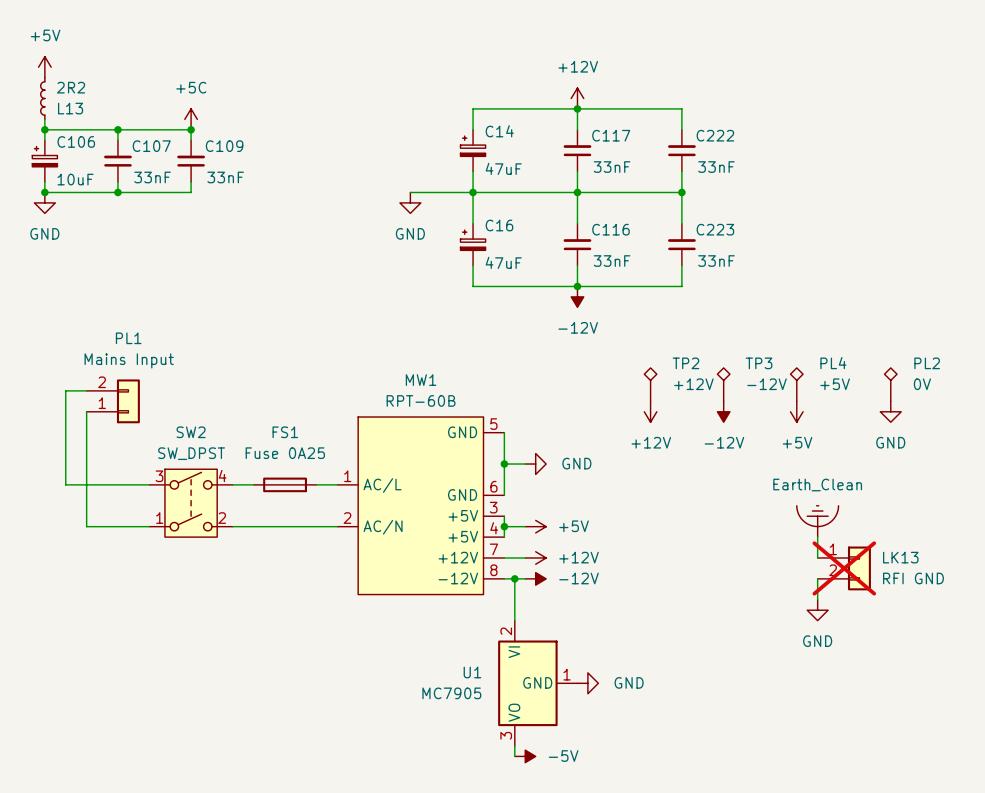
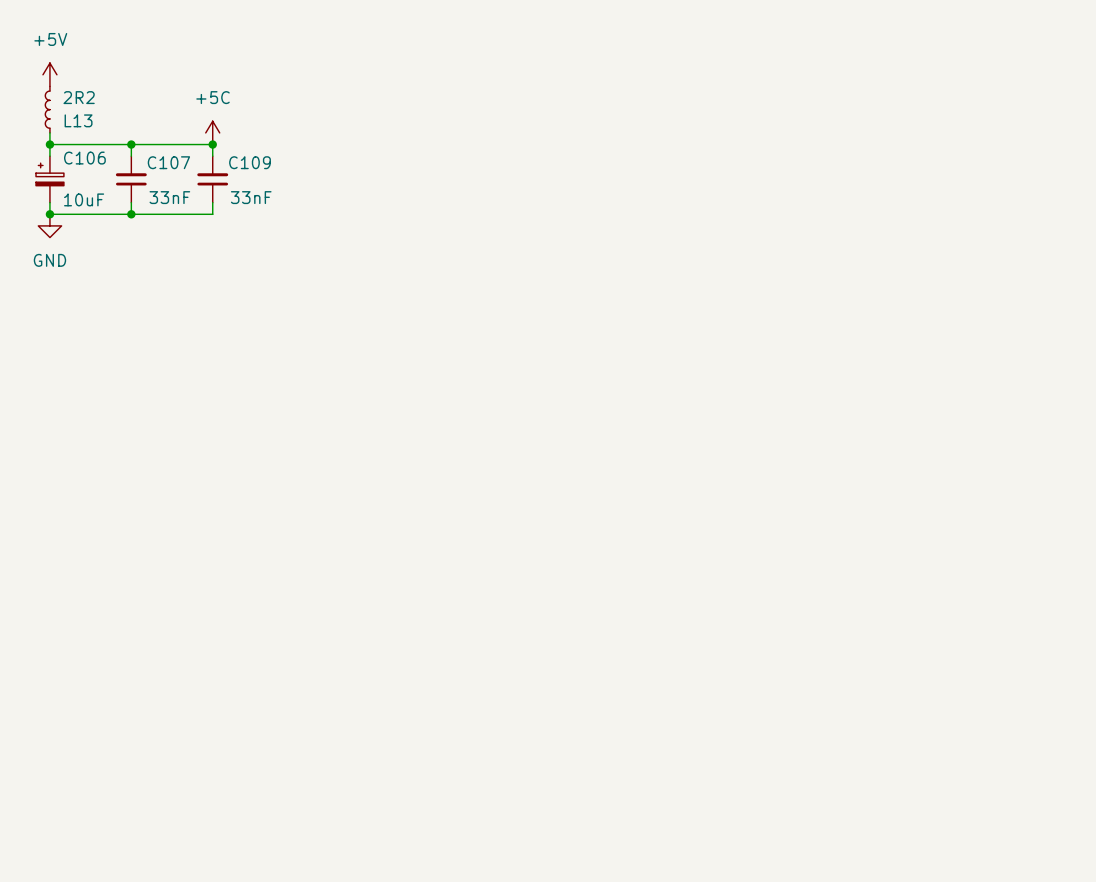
power symbol: +12V (577, 98) -> none
wire: (577, 108) (577, 129) -> none
junction: (577, 108) -> none
wire: (473, 129) (473, 108) (681, 108) (681, 129) -> none
C14: 47uF (473, 150) -> none
C117: 33nF (577, 150) -> none
C222: 33nF (681, 150) -> none
wire: (473, 171) (473, 223) -> none
wire: (577, 171) (577, 223) -> none
wire: (681, 171) (681, 223) -> none
wire: (410, 192) (681, 192) -> none
junction: (473, 192) -> none
junction: (577, 192) -> none
junction: (681, 192) -> none
power symbol: GND (410, 202) -> none
C16: 47uF (473, 244) -> none
C116: 33nF (577, 244) -> none
C223: 33nF (681, 244) -> none
wire: (473, 265) (473, 286) (681, 286) (681, 265) -> none
wire: (577, 265) (577, 286) -> none
junction: (577, 286) -> none
power symbol: -12V (577, 296) -> none
TP2: +12V (650, 384) -> none
TP3: -12V (723, 384) -> none
PL4: +5V (796, 384) -> none
PL2: 0V (890, 384) -> none
wire: (86, 390) (65, 390) (65, 484) (149, 484) -> none
PL1: Mains Input (113, 401) -> none
wire: (86, 411) (86, 526) (149, 526) -> none
power symbol: +12V (650, 411) -> none
power symbol: -12V (723, 411) -> none
power symbol: +5V (796, 411) -> none
power symbol: GND (890, 411) -> none
wire: (504, 432) (504, 495) -> none
wire: (504, 464) (525, 464) -> none
junction: (504, 464) -> none
power symbol: GND (535, 464) -> none
wire: (232, 484) (253, 484) -> none
FS1: Fuse 0A25 (285, 484) -> none
wire: (316, 484) (337, 484) -> none
SW2: SW_DPST (191, 503) -> none
MW1: RPT-60B (420, 505) -> none
wire: (504, 516) (504, 537) -> none
power symbol: Earth_Clean (817, 521) -> none
wire: (232, 526) (337, 526) -> none
wire: (504, 526) (525, 526) -> none
junction: (504, 526) -> none
power symbol: +5V (535, 526) -> none
wire: (817, 537) (817, 557) -> none
wire: (504, 557) (525, 557) -> none
power symbol: +12V (535, 557) -> none
LK13: RFI GND (844, 568) -> none
wire: (504, 578) (525, 578) -> none
wire: (514, 578) (514, 620) -> none
junction: (514, 578) -> none
power symbol: -12V (535, 578) -> none
wire: (817, 578) (817, 599) -> none
power symbol: GND (817, 610) -> none
U1: MC7905 (537, 683) -> none
power symbol: GND (587, 683) -> none
wire: (514, 745) (514, 756) -> none
power symbol: -5V (525, 756) -> none

